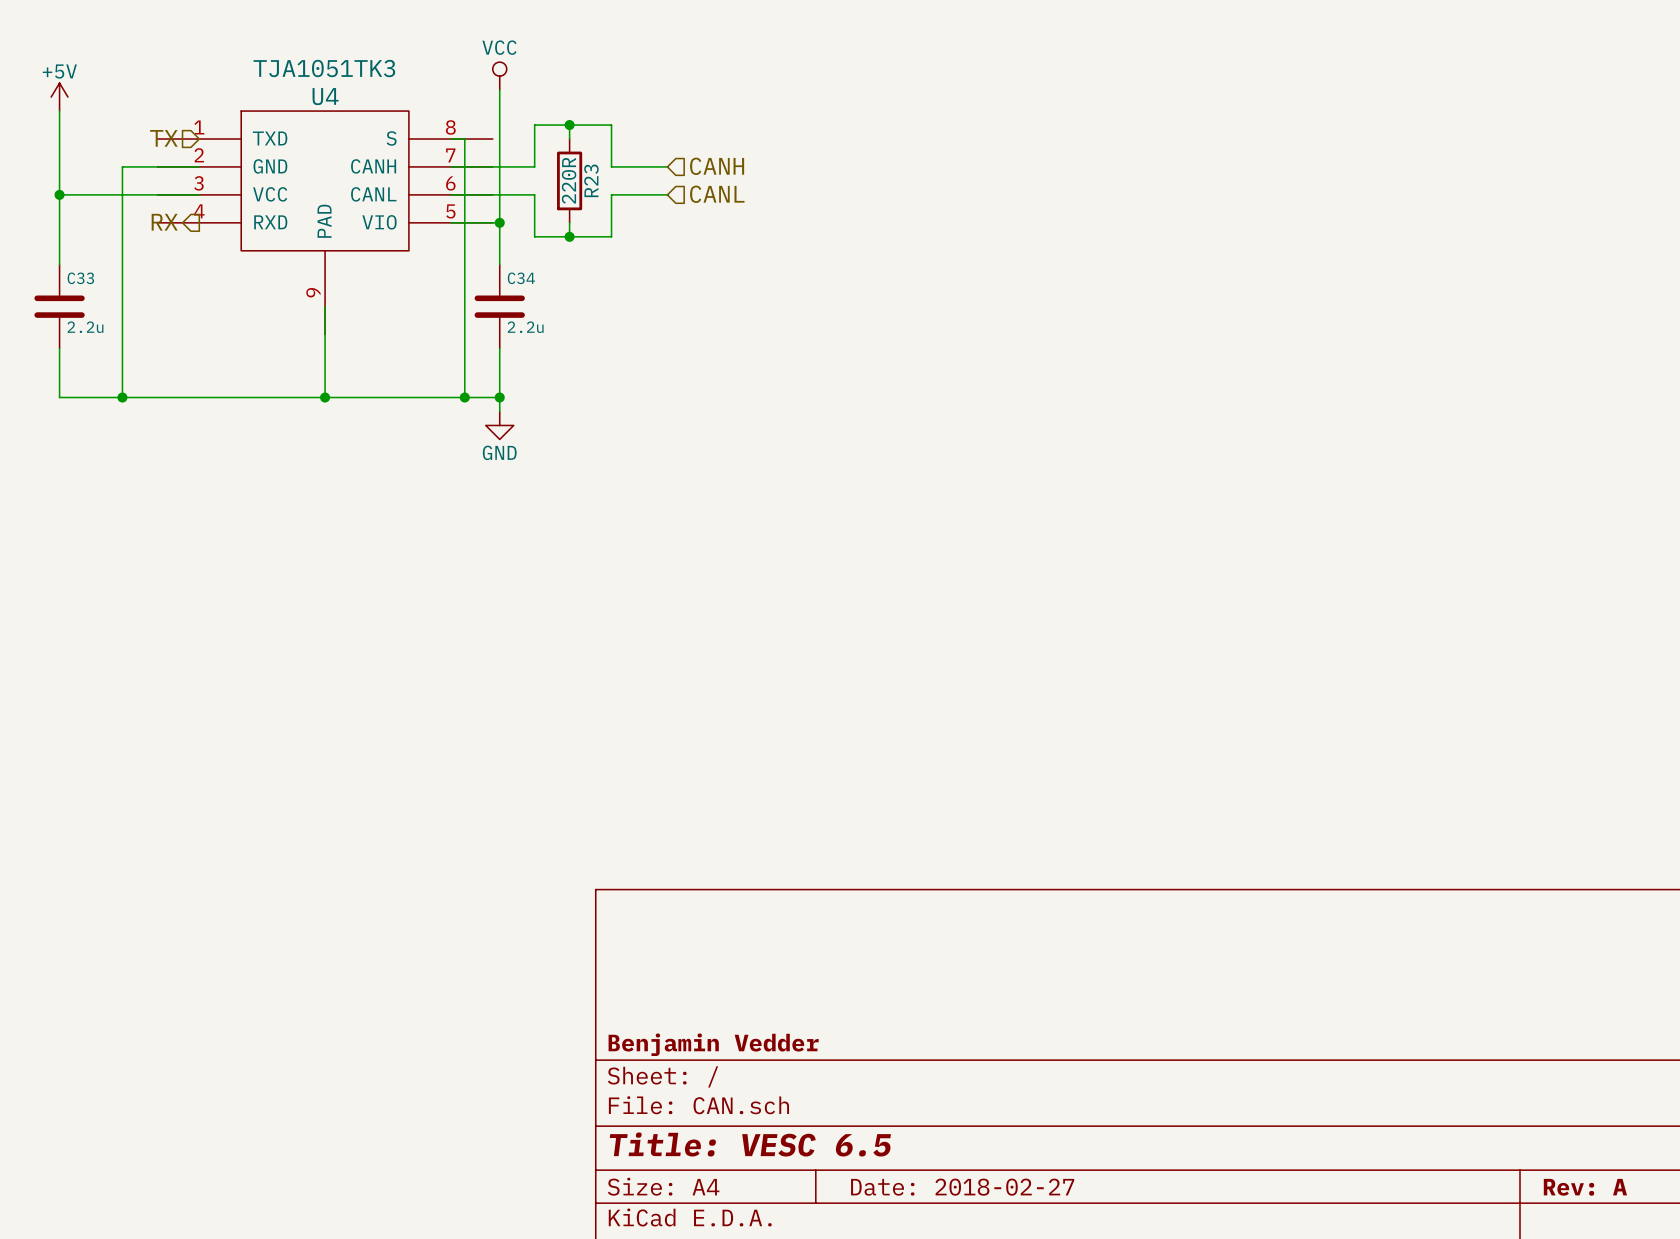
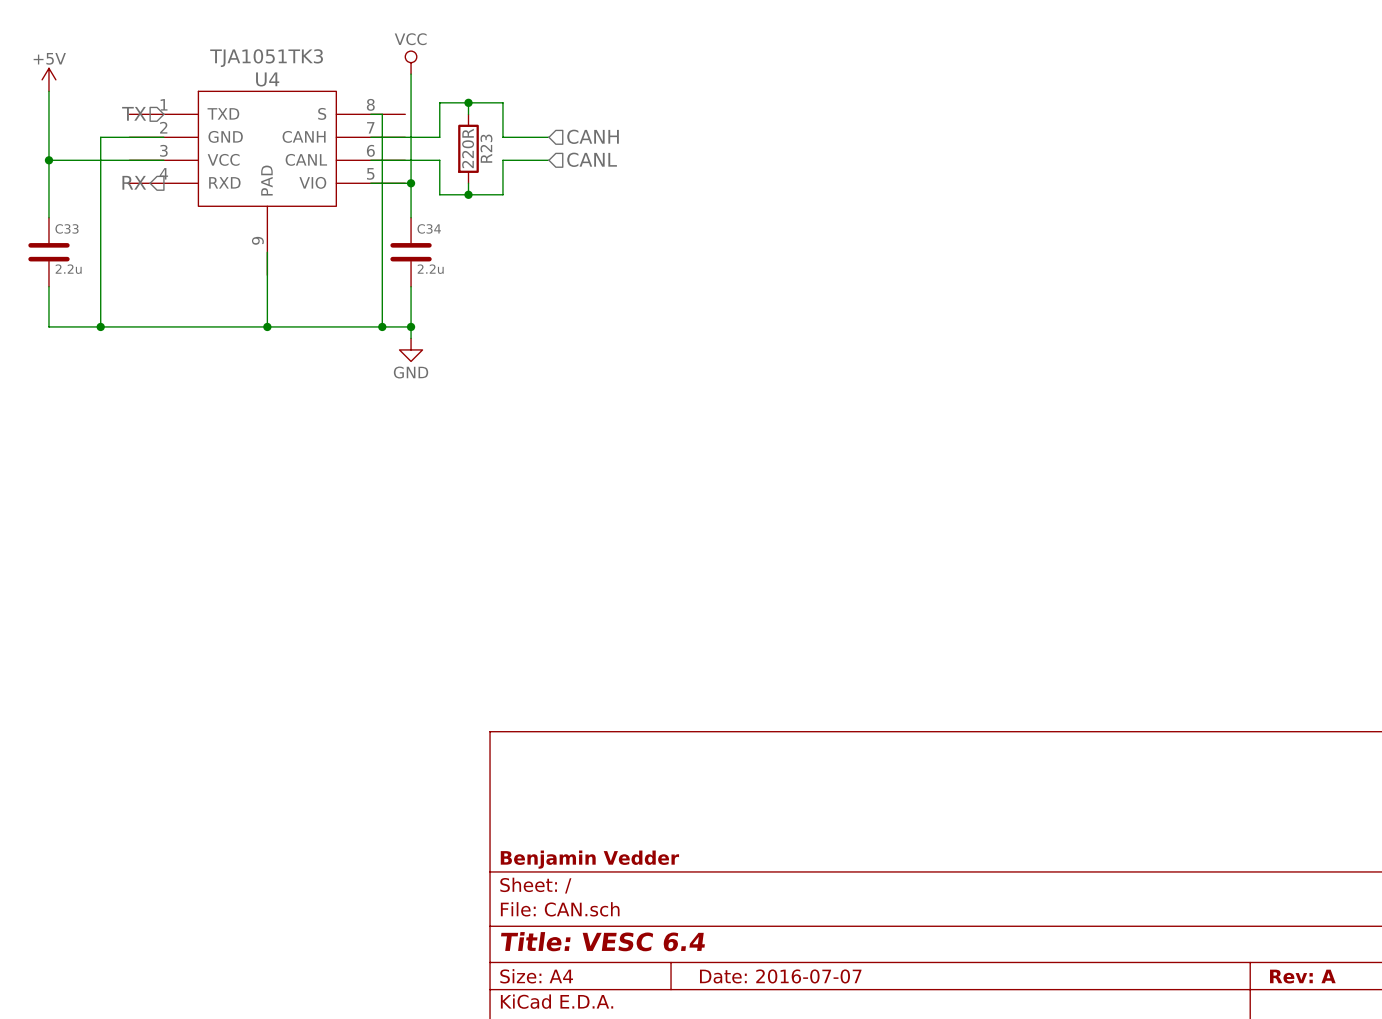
title block: Title: VESC 6.5 (750, 1144) -> Title: VESC 6.4 (602, 941)
title block: Date: 2018-02-27 (962, 1187) -> Date: 2016-07-07 (780, 976)

